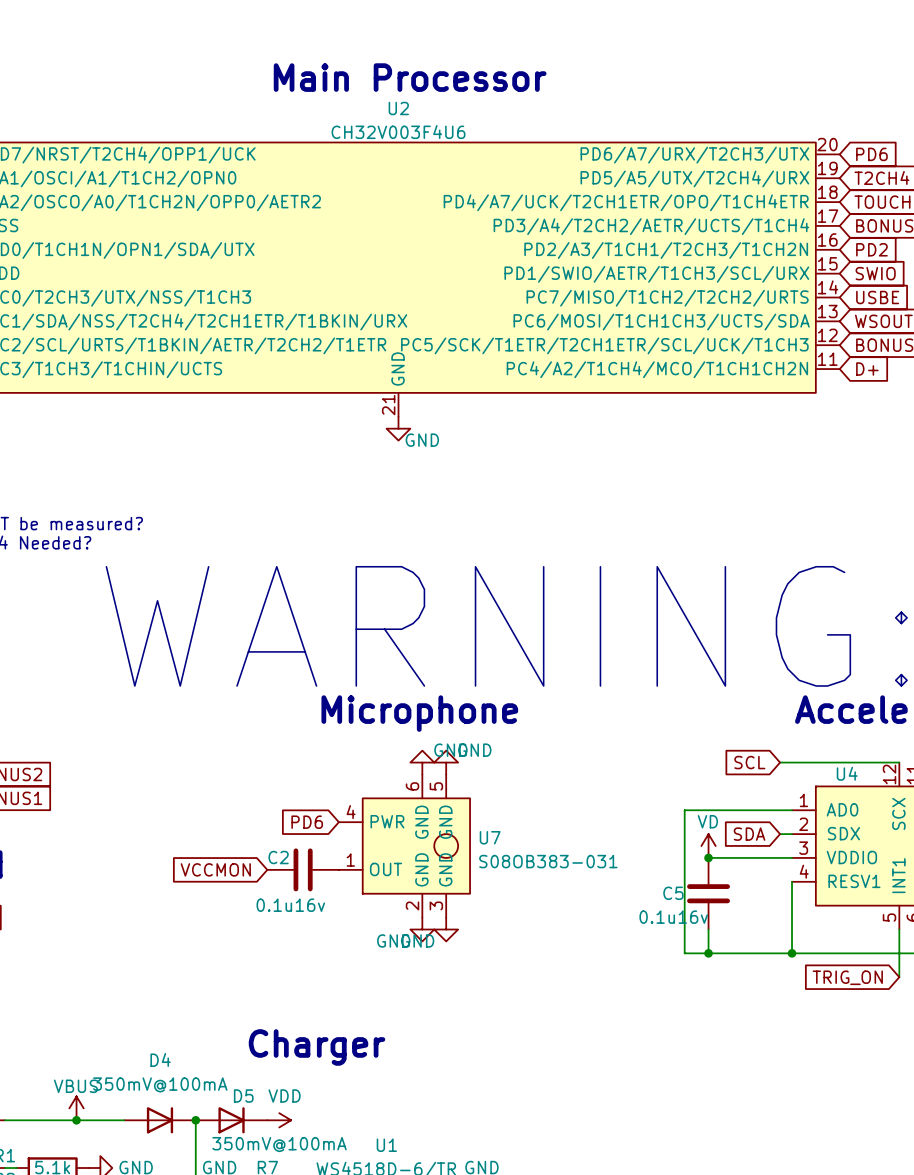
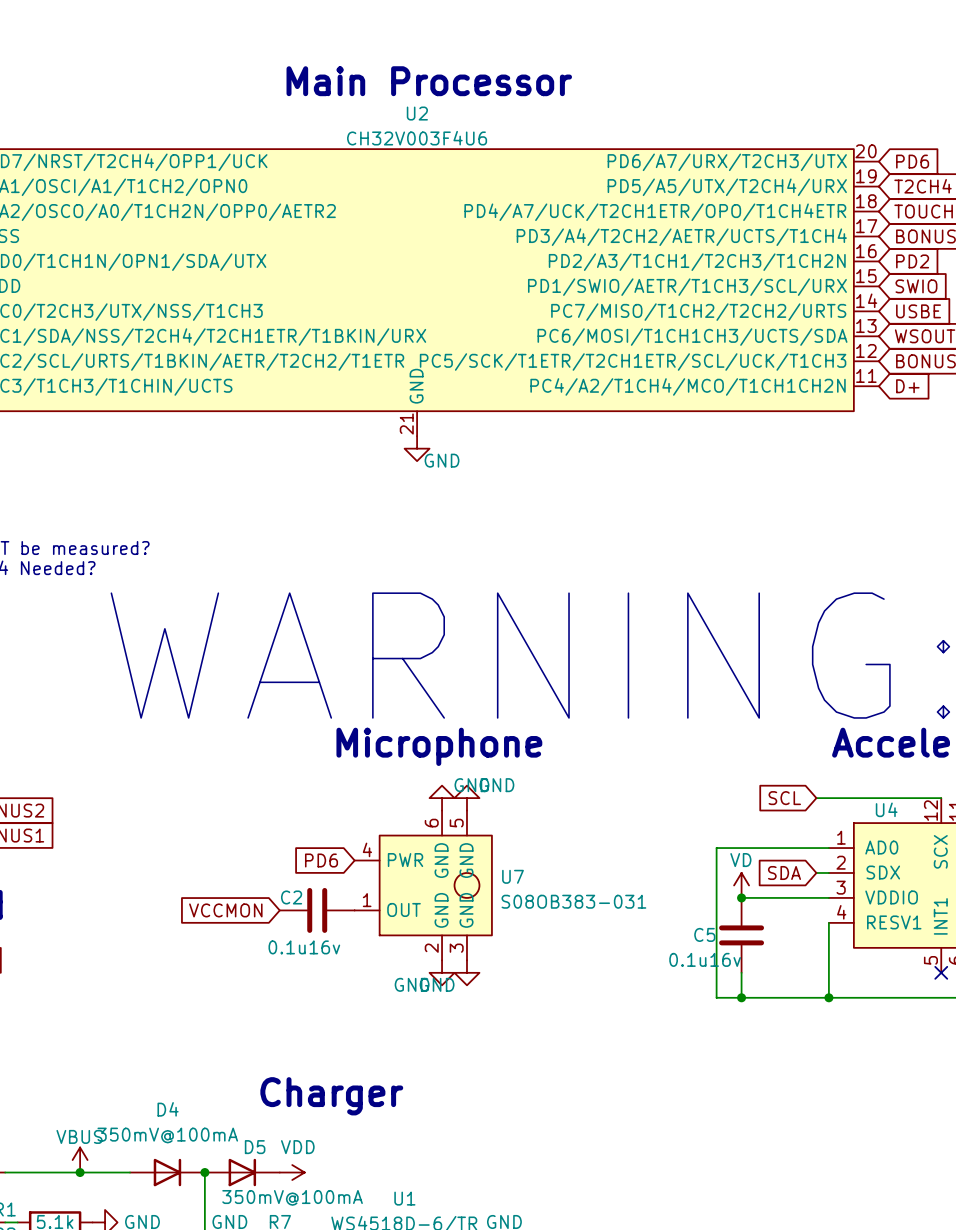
wire: (899, 929) (899, 977) -> none
no-connect mark: none -> (941, 972)
global label: TRIG_ON (847, 977) -> none

